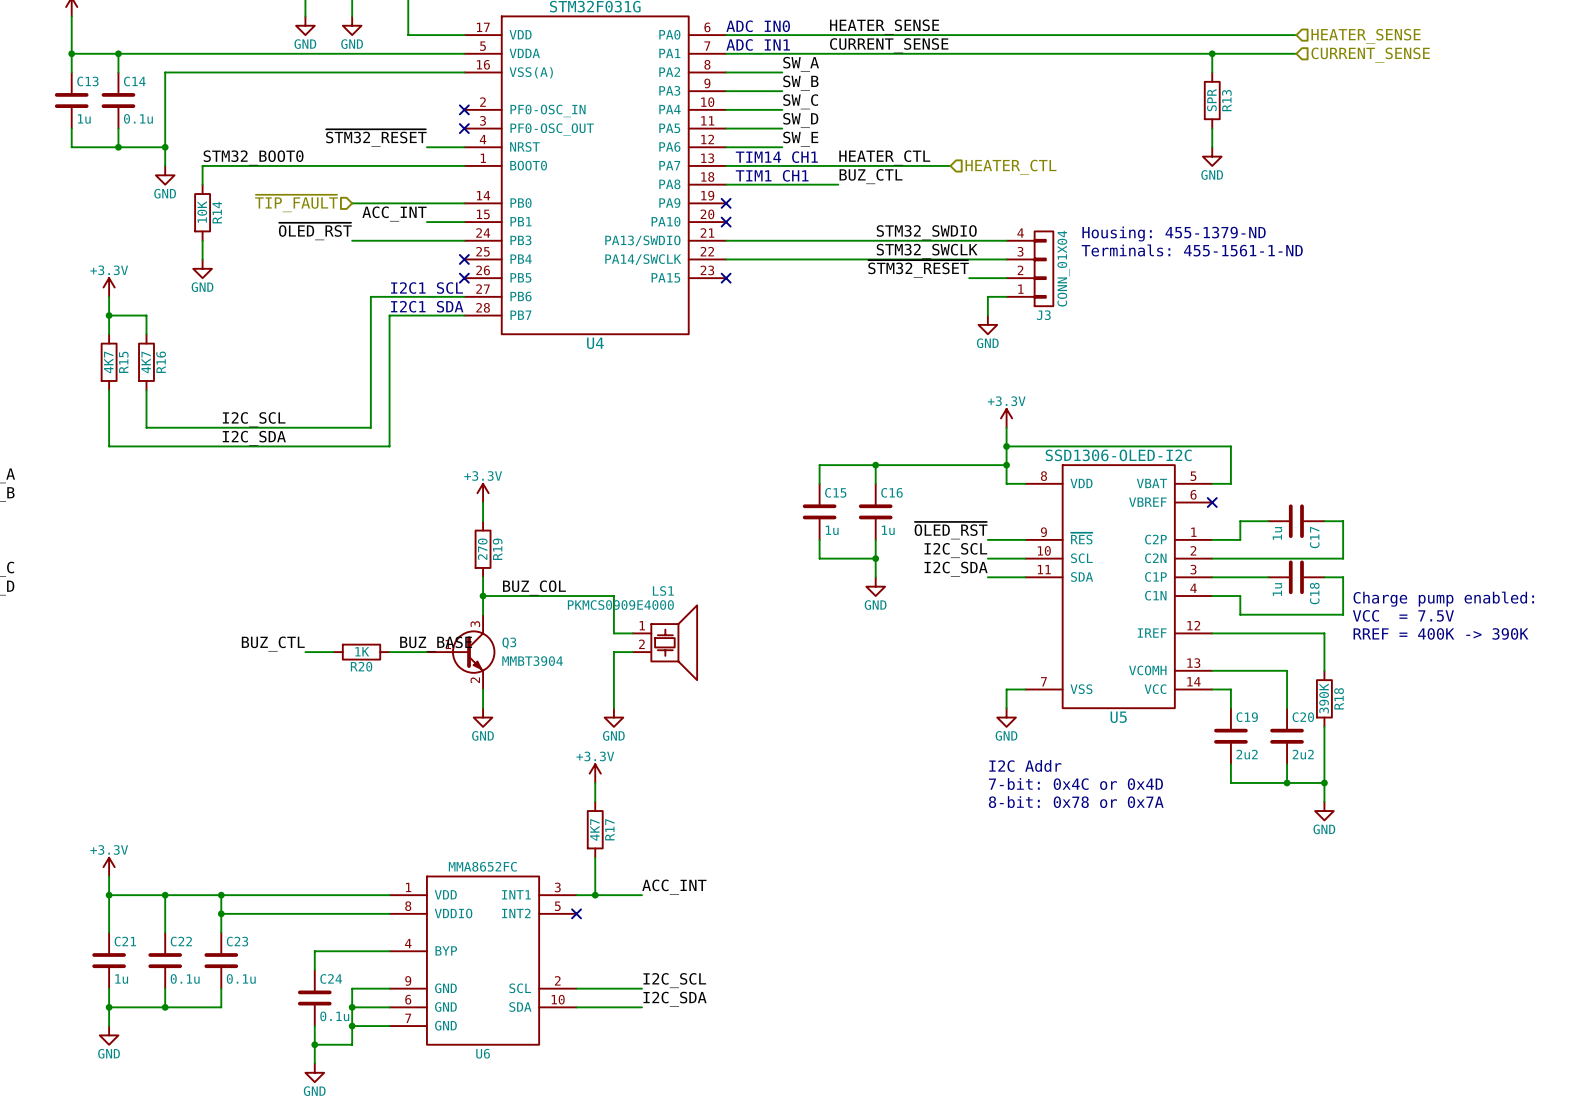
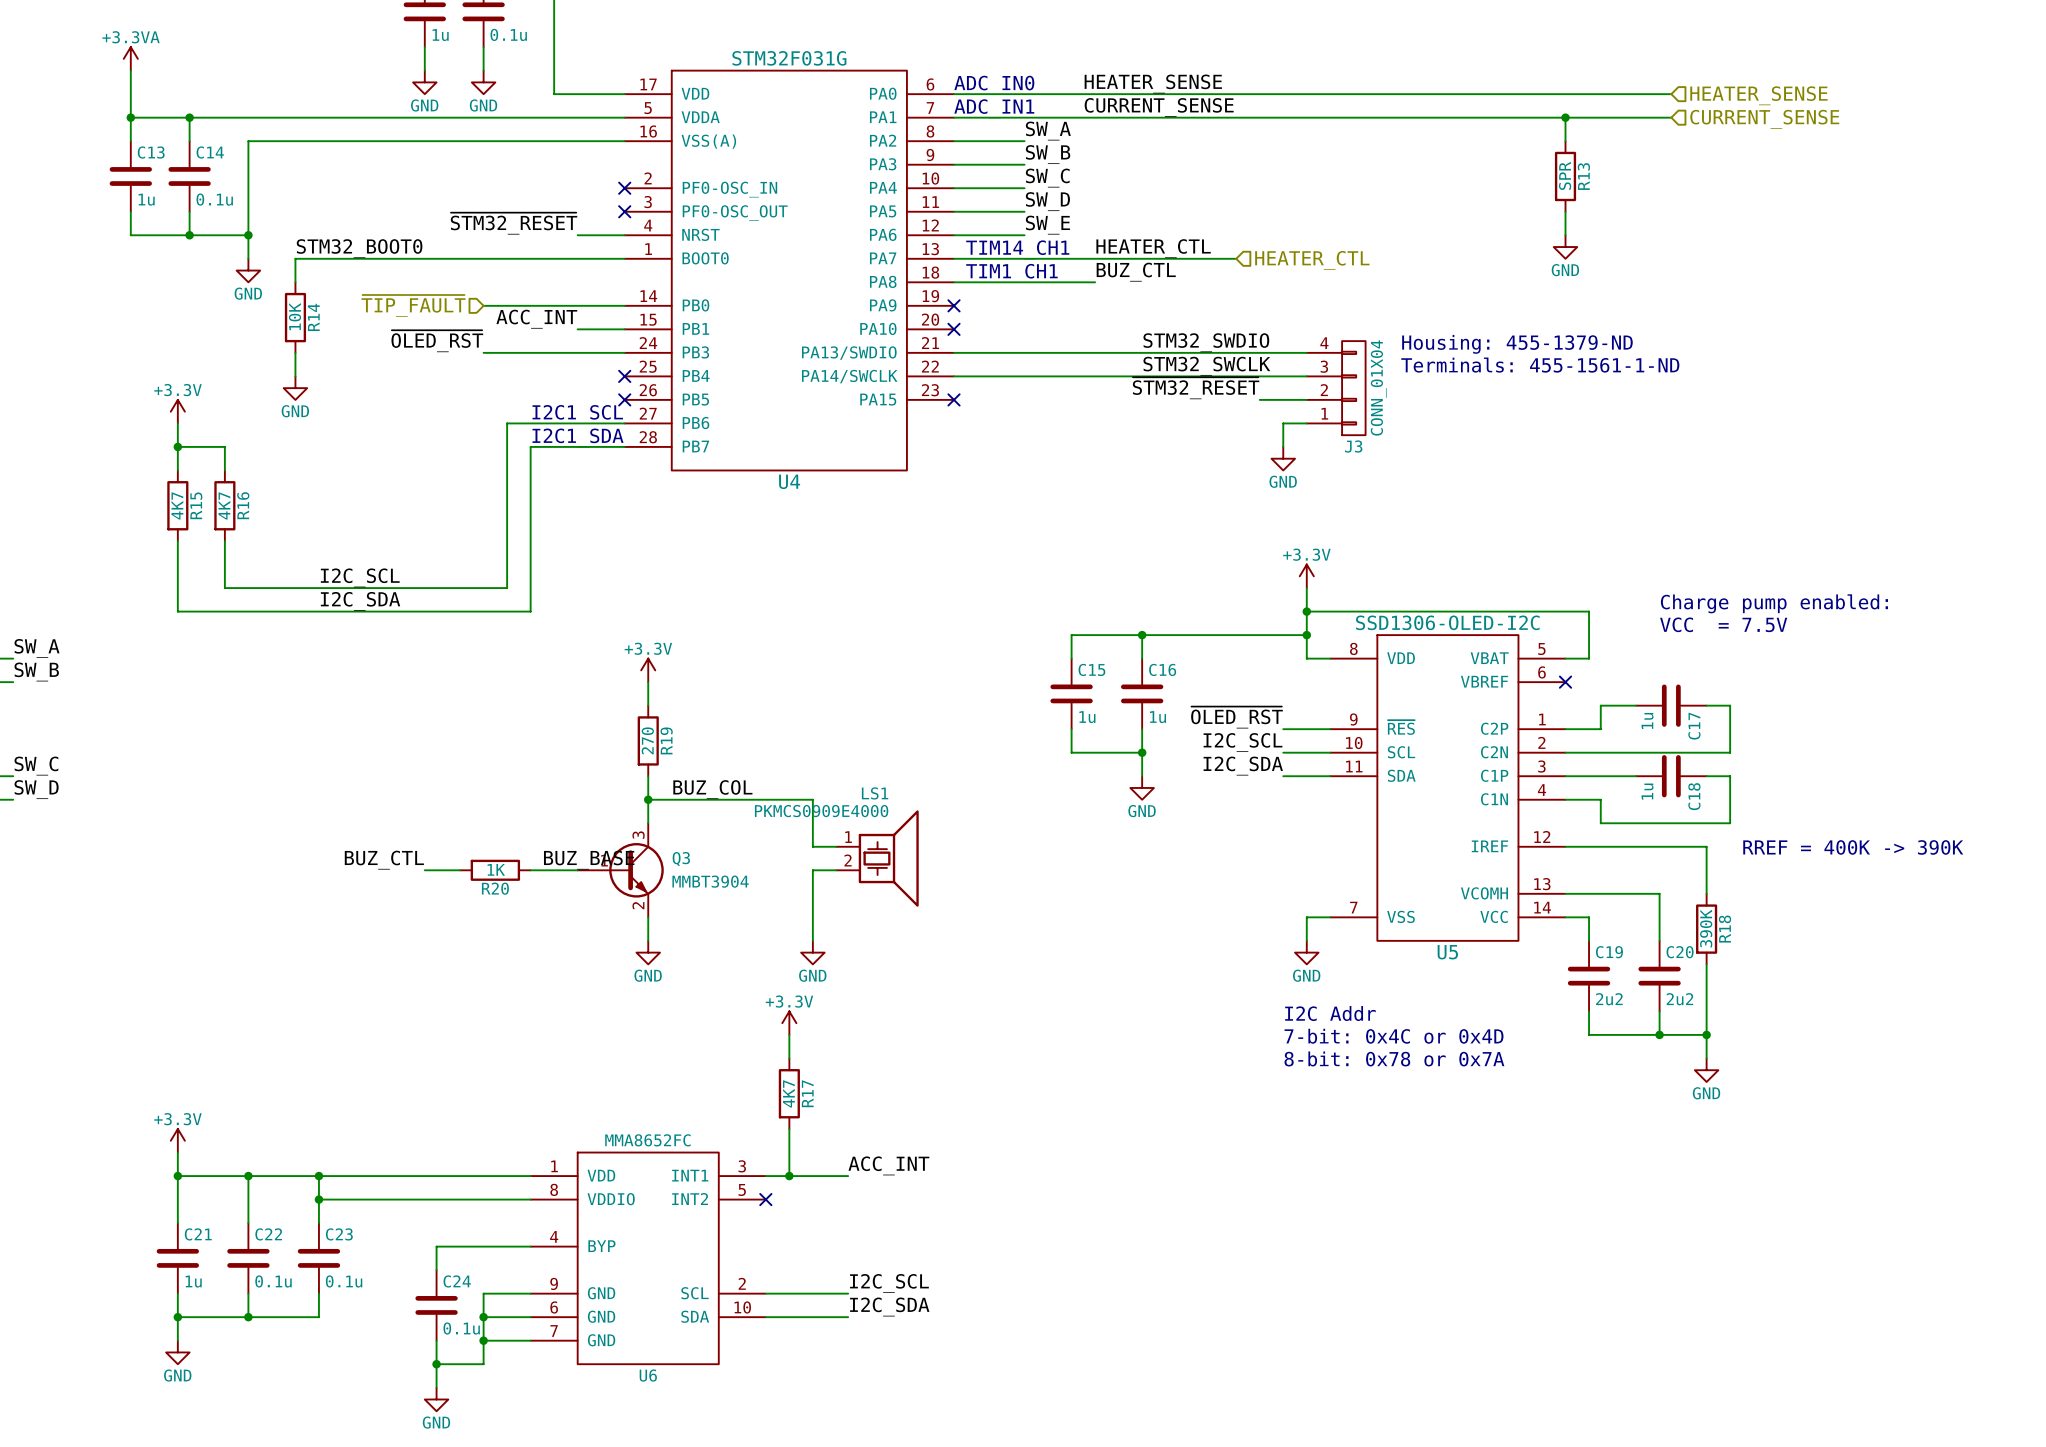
text position: Charge pump enabled: (1443, 599) -> Charge pump enabled: (1774, 603)
text position: VCC = 7.5V (1403, 615) -> VCC = 7.5V (1723, 624)

